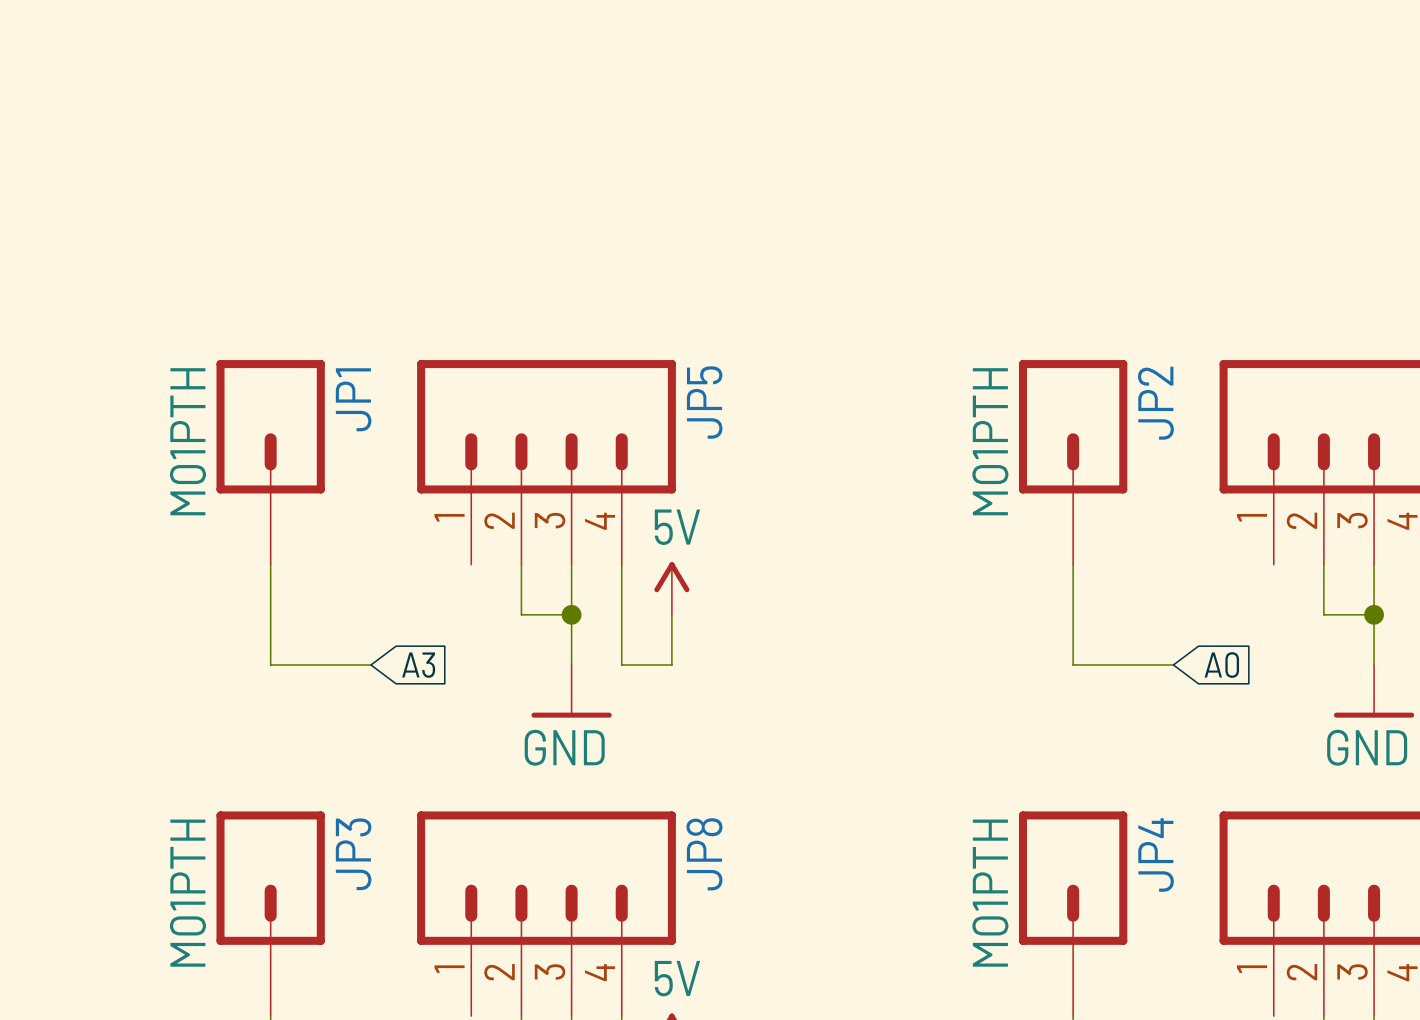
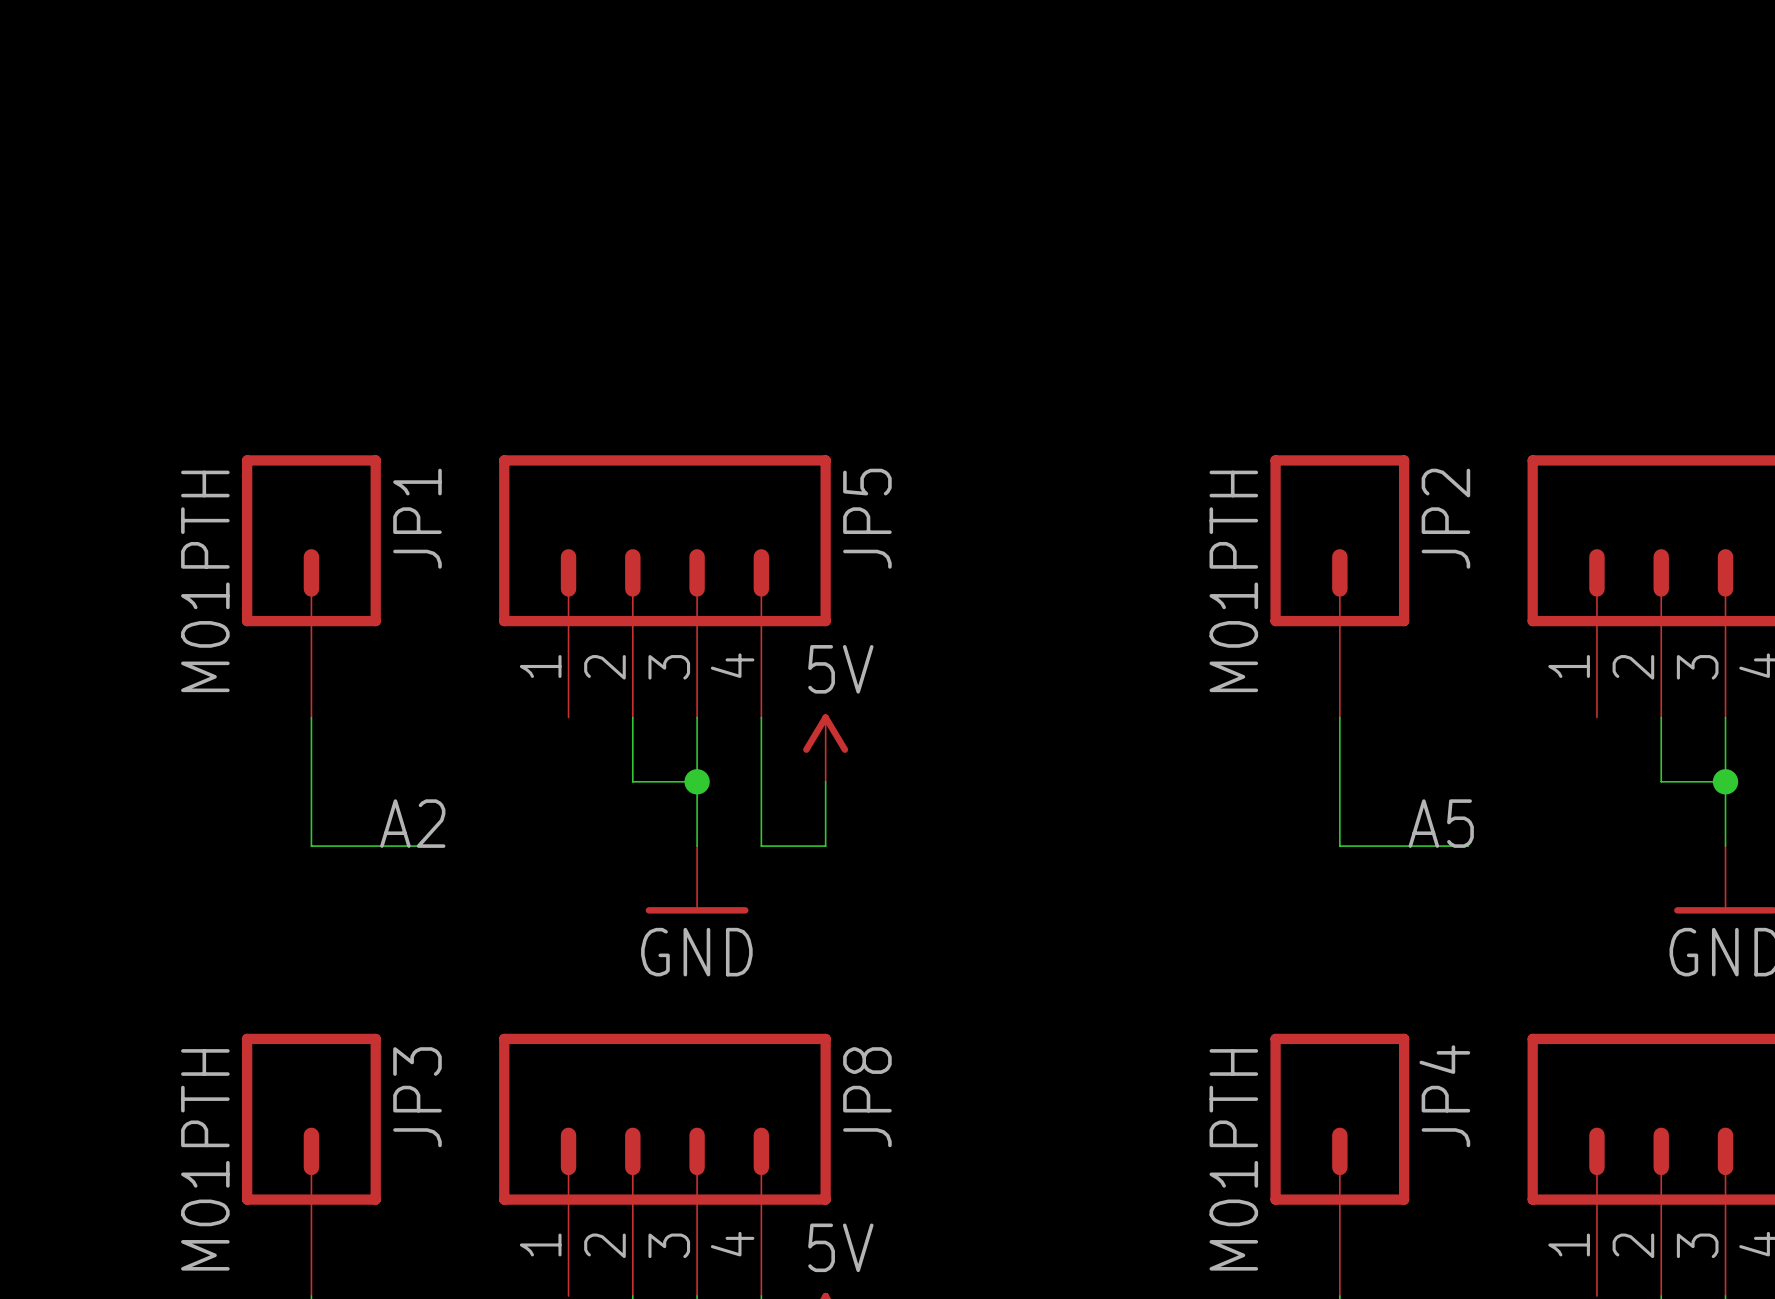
label: none -> A2 (412, 823)
label: none -> A5 (1441, 823)
global label: A3 (418, 665) -> none
global label: A0 (1221, 665) -> none

